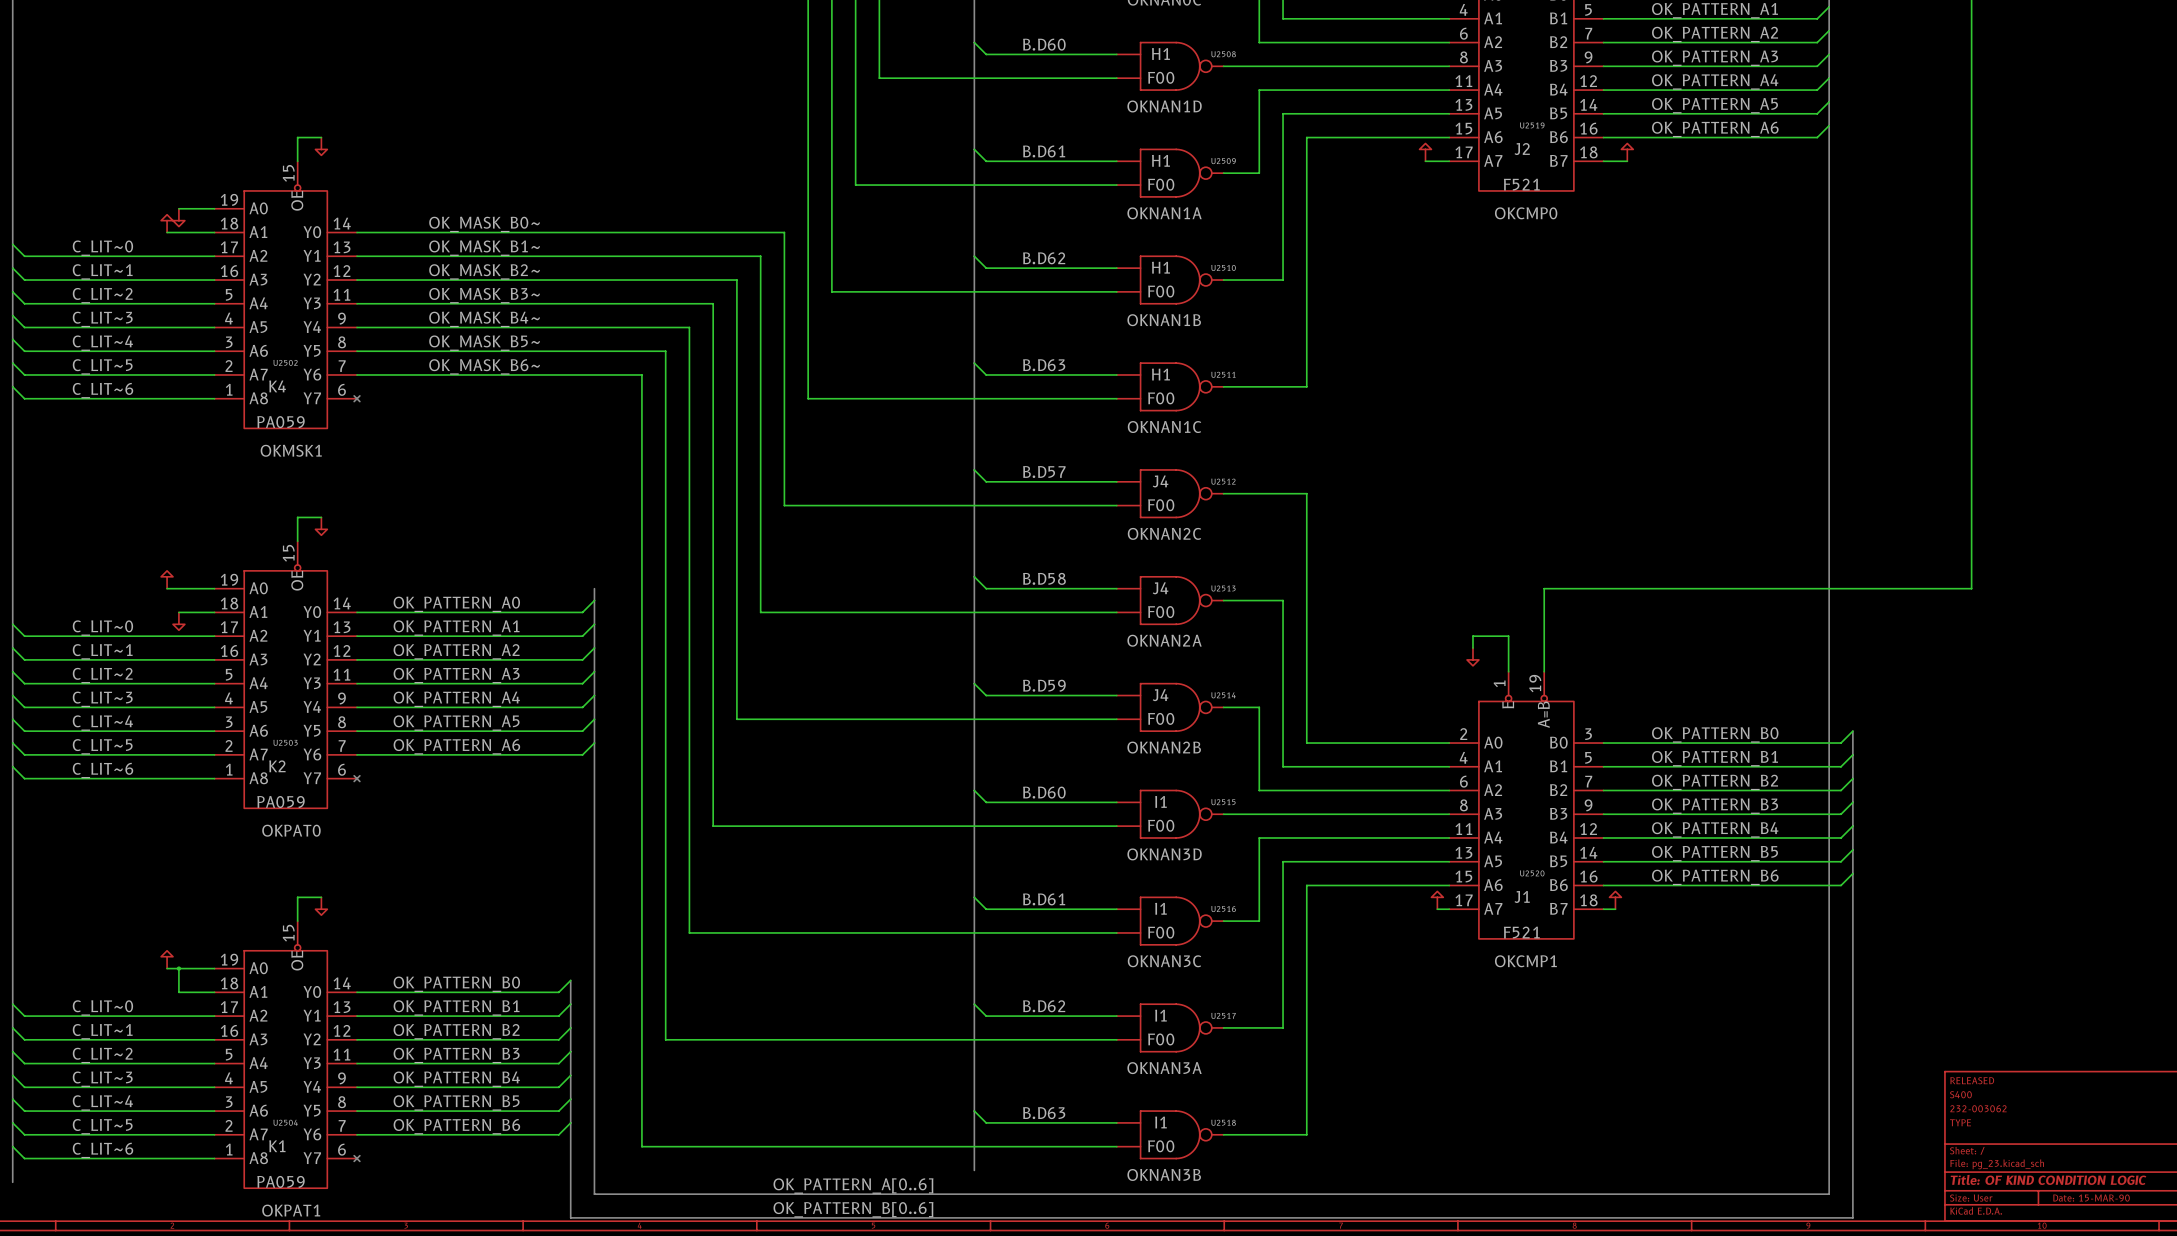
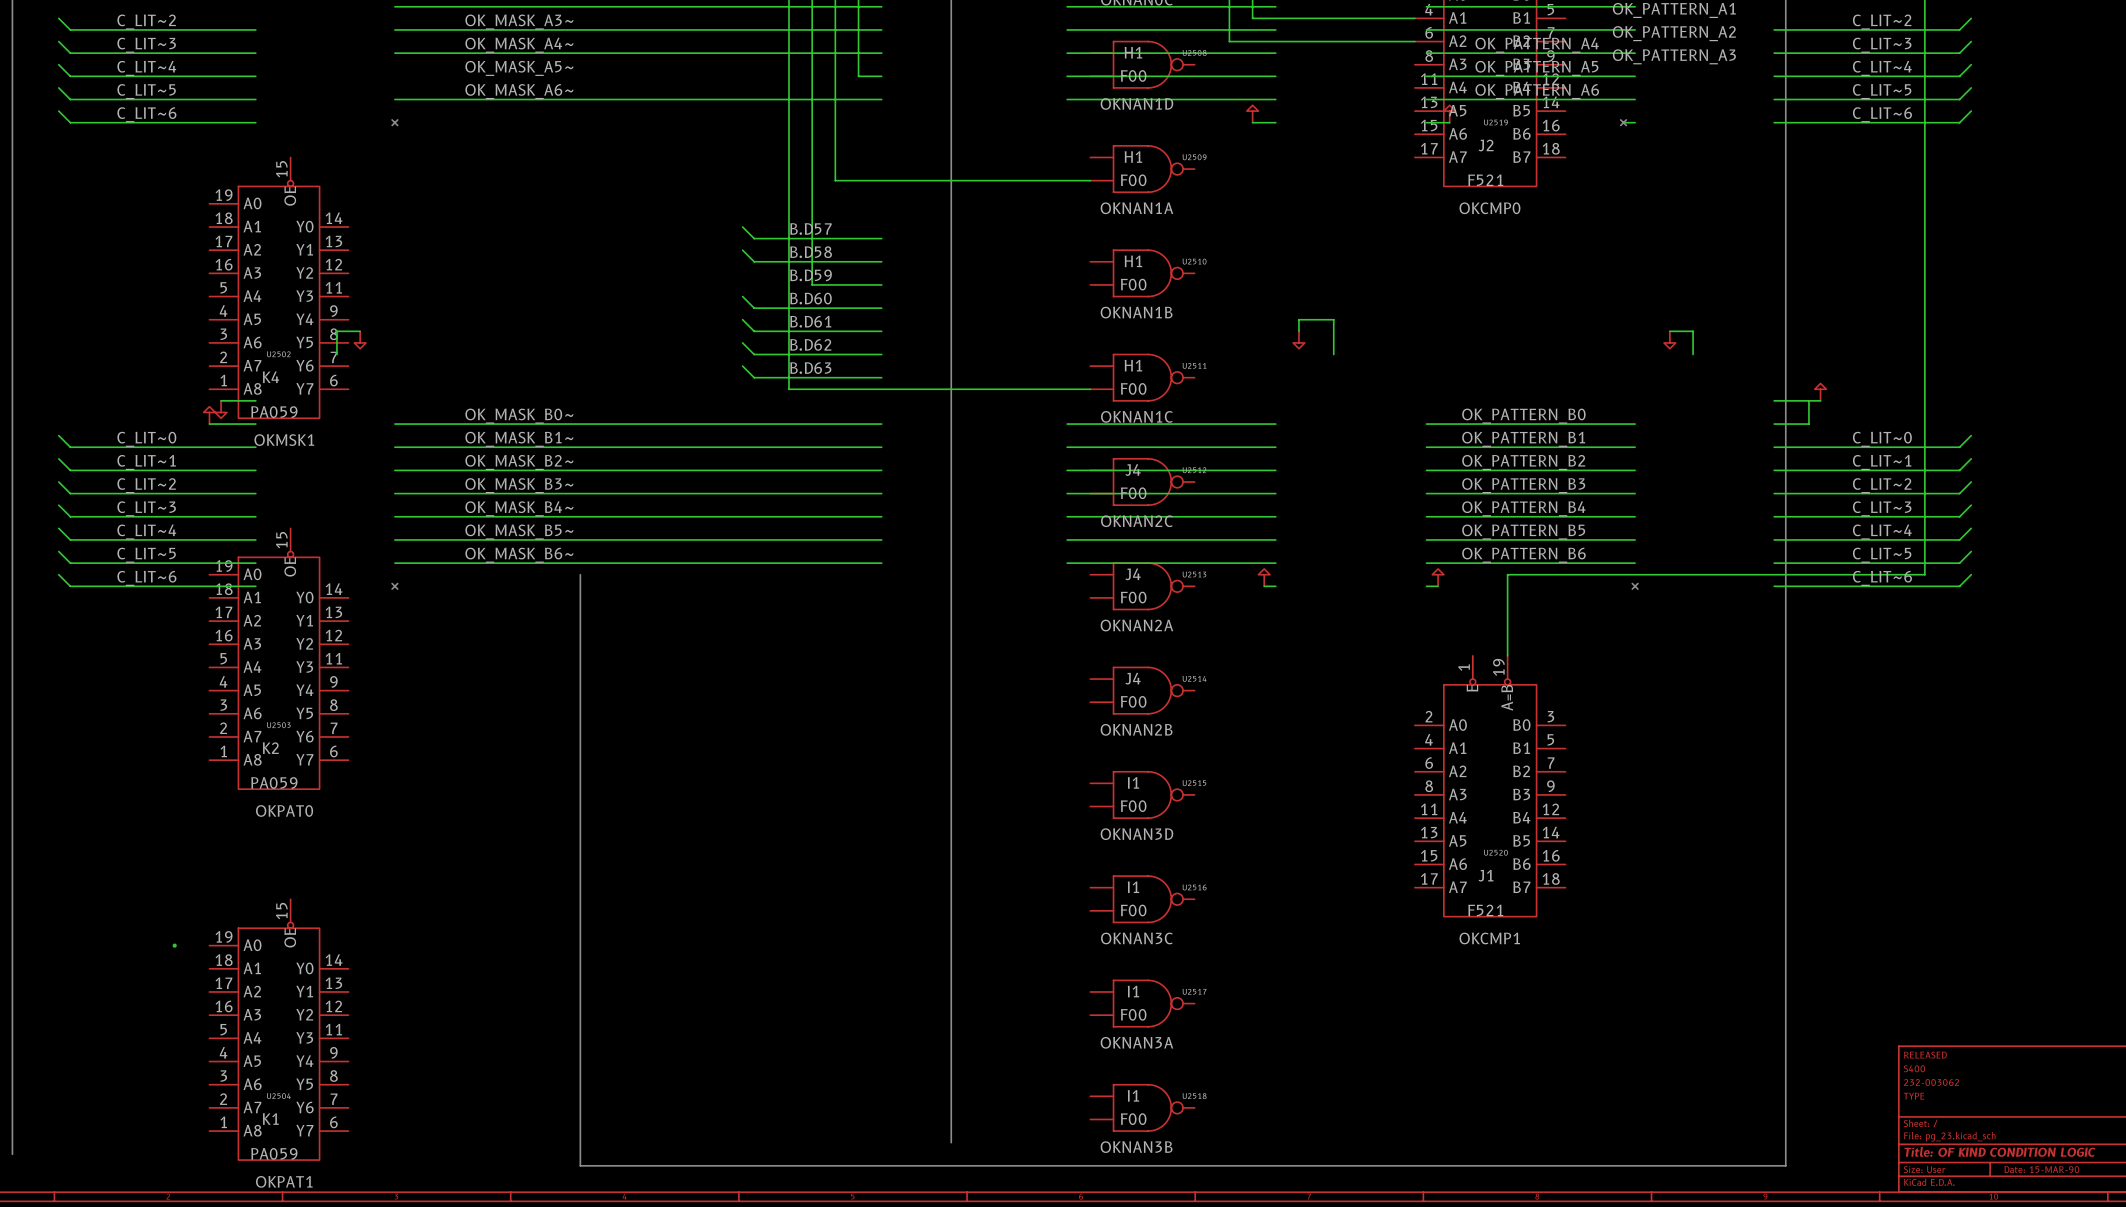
wire: none -> (394, 6) (881, 6)
wire: none -> (1067, 6) (1275, 6)
wire: none -> (1426, 6) (1635, 6)
wire: (1829, 6) (1817, 18) (1603, 18) -> none
wire: none -> (58, 18) (70, 29) (255, 29)
wire: none -> (1971, 18) (1959, 29) (1774, 29)
label: none -> C_LIT~2 (146, 22)
label: none -> OK_MASK_A3~ (519, 22)
label: none -> C_LIT~2 (1882, 22)
wire: none -> (394, 29) (881, 29)
wire: none -> (1067, 29) (1275, 29)
wire: none -> (1426, 29) (1635, 29)
wire: (1829, 30) (1817, 42) (1603, 42) -> none
wire: none -> (58, 41) (70, 53) (255, 53)
wire: (974, 42) (986, 54) (1093, 54) -> none
wire: none -> (1971, 41) (1959, 53) (1774, 53)
label: B.D60 (1044, 44) -> none
label: none -> C_LIT~3 (146, 45)
label: none -> OK_MASK_A4~ (519, 45)
label: none -> C_LIT~3 (1882, 45)
wire: none -> (394, 53) (881, 53)
wire: none -> (1090, 53) (1275, 53)
wire: none -> (1426, 53) (1635, 53)
wire: (1829, 54) (1817, 66) (1603, 66) -> none
wire: none -> (58, 64) (70, 76) (255, 76)
wire: (1223, 66) (1449, 66) -> none
wire: none -> (1971, 64) (1959, 76) (1774, 76)
label: none -> C_LIT~4 (146, 68)
label: none -> OK_MASK_A5~ (519, 68)
label: none -> C_LIT~4 (1882, 68)
wire: (903, 78) (1093, 78) -> none
wire: none -> (1090, 76) (1275, 76)
wire: none -> (1426, 76) (1635, 76)
wire: (1829, 78) (1817, 90) (1603, 90) -> none
label position: OK_PATTERN_A4 (1715, 81) -> OK_PATTERN_A4 (1537, 45)
wire: none -> (58, 87) (70, 99) (255, 99)
wire: (1449, 90) (1259, 90) (1259, 173) (1223, 173) -> none
wire: none -> (1971, 87) (1959, 99) (1774, 99)
label: none -> C_LIT~5 (146, 91)
label: none -> OK_MASK_A6~ (519, 91)
label: none -> C_LIT~5 (1882, 91)
wire: none -> (394, 99) (881, 99)
wire: none -> (1067, 99) (1275, 99)
wire: none -> (1426, 99) (1635, 99)
wire: (1829, 101) (1817, 113) (1603, 113) -> none
label position: OK_PATTERN_A5 (1715, 105) -> OK_PATTERN_A5 (1536, 68)
wire: none -> (58, 111) (70, 122) (255, 122)
wire: (1449, 113) (1283, 113) (1283, 280) (1223, 280) -> none
wire: none -> (1971, 111) (1959, 122) (1774, 122)
power symbol: none -> (1252, 113)
label: none -> C_LIT~6 (146, 114)
label: none -> C_LIT~6 (1882, 114)
no-connect mark: none -> (394, 122)
wire: none -> (1252, 122) (1275, 122)
wire: none -> (1623, 122) (1635, 122)
no-connect mark: none -> (1623, 122)
wire: (1829, 125) (1817, 137) (1603, 137) -> none
label position: OK_PATTERN_A6 (1715, 129) -> OK_PATTERN_A6 (1537, 91)
wire: (321, 137) (297, 137) (297, 161) -> none
wire: (1449, 137) (1306, 137) (1306, 386) (1223, 386) -> none
power symbol: (321, 146) -> none
wire: (974, 149) (986, 161) (1116, 161) -> none
label: B.D61 (1044, 151) -> none
power symbol position: (1425, 152) -> (1449, 113)
power symbol: (1627, 152) -> none
wire: (1425, 161) (1449, 161) -> (1426, 122) (1449, 122)
wire: (1603, 161) (1627, 161) -> none
wire: (178, 208) (214, 208) -> none
power symbol: (178, 217) -> none
power symbol: (167, 223) -> none
label: OK_MASK_B0~ (484, 224) -> none
wire: (167, 232) (214, 232) -> none
wire: (357, 232) (784, 232) (784, 505) -> (394, 493) (765, 493)
wire: none -> (742, 227) (754, 238) (881, 238)
label: none -> B.D57 (810, 229)
wire: (12, 244) (24, 256) (214, 256) -> none
label: C_LIT~0 (102, 248) -> none
label: OK_MASK_B1~ (484, 248) -> none
wire: (357, 256) (760, 256) (760, 612) (1116, 612) -> none
wire: none -> (742, 250) (754, 261) (881, 261)
wire: (974, 256) (986, 268) (1116, 268) -> none
label: none -> B.D58 (811, 252)
label: B.D62 (1044, 258) -> none
wire: (12, 268) (24, 280) (214, 280) -> none
label: C_LIT~1 (102, 271) -> none
label: OK_MASK_B2~ (484, 271) -> none
wire: (357, 280) (736, 280) (736, 719) (1116, 719) -> none
label: none -> B.D59 (811, 275)
wire: (12, 291) (24, 303) (214, 303) -> none
wire: (903, 291) (1116, 291) -> none
label: C_LIT~2 (102, 295) -> none
label: OK_MASK_B3~ (484, 295) -> none
wire: (357, 303) (713, 303) (713, 826) (1116, 826) -> none
wire: none -> (742, 296) (754, 308) (881, 308)
label: none -> B.D60 (810, 298)
wire: (12, 315) (24, 327) (214, 327) -> none
label: C_LIT~3 (102, 319) -> none
label: OK_MASK_B4~ (484, 319) -> none
wire: (357, 327) (689, 327) (689, 932) (1116, 932) -> none
wire: none -> (742, 319) (754, 331) (881, 331)
label: none -> B.D61 (810, 321)
wire: (12, 339) (24, 351) (214, 351) -> none
wire: none -> (360, 331) (336, 331) (336, 354)
wire: none -> (1298, 331) (1298, 319) (1333, 319) (1333, 354)
wire: none -> (1669, 331) (1693, 331) (1693, 354)
label: C_LIT~4 (102, 343) -> none
label: OK_MASK_B5~ (484, 343) -> none
power symbol: none -> (360, 340)
power symbol: none -> (1298, 340)
power symbol: none -> (1669, 340)
wire: (357, 351) (665, 351) (665, 1039) (1116, 1039) -> none
wire: none -> (742, 342) (754, 354) (881, 354)
label: none -> B.D62 (810, 344)
wire: (12, 363) (24, 374) (214, 374) -> (58, 435) (70, 447) (255, 447)
wire: (974, 363) (986, 374) (1116, 374) -> none
label: B.D63 (1044, 365) -> none
label: C_LIT~5 (102, 366) -> none
label: OK_MASK_B6~ (484, 366) -> none
wire: (357, 374) (641, 374) (641, 1146) (1116, 1146) -> none
wire: none -> (742, 366) (754, 377) (881, 377)
label: none -> B.D63 (810, 368)
wire: (12, 386) (24, 398) (214, 398) -> (58, 458) (70, 470) (255, 470)
label: C_LIT~6 (102, 390) -> none
no-connect mark: (357, 398) -> none
power symbol: none -> (1820, 392)
wire: none -> (221, 400) (255, 400)
wire: none -> (1774, 400) (1820, 400)
wire: none -> (1808, 400) (1808, 424) (1774, 424)
power symbol: none -> (221, 409)
power symbol: none -> (209, 415)
label: none -> OK_MASK_B0~ (519, 416)
label: none -> OK_PATTERN_B0 (1523, 416)
wire: none -> (209, 424) (255, 424)
wire: none -> (394, 424) (881, 424)
wire: none -> (1067, 424) (1275, 424)
wire: none -> (1426, 424) (1635, 424)
wire: none -> (1971, 435) (1959, 447) (1774, 447)
label: none -> C_LIT~0 (146, 439)
label: none -> OK_MASK_B1~ (519, 439)
label: none -> OK_PATTERN_B1 (1523, 439)
label: none -> C_LIT~0 (1882, 439)
wire: none -> (394, 447) (881, 447)
wire: none -> (1067, 447) (1275, 447)
wire: none -> (1426, 447) (1635, 447)
wire: (974, 469) (986, 481) (1093, 481) -> none
wire: none -> (1971, 458) (1959, 470) (1774, 470)
label: B.D57 (1044, 472) -> none
label: none -> C_LIT~1 (146, 462)
label: none -> OK_MASK_B2~ (519, 462)
label: none -> OK_PATTERN_B2 (1523, 462)
label: none -> C_LIT~1 (1882, 462)
wire: none -> (394, 470) (881, 470)
wire: none -> (1090, 470) (1275, 470)
wire: none -> (1426, 470) (1635, 470)
wire: none -> (58, 482) (70, 493) (255, 493)
wire: (1223, 493) (1306, 493) (1306, 743) (1449, 743) -> none
wire: none -> (1971, 482) (1959, 493) (1774, 493)
label: none -> C_LIT~2 (146, 485)
label: none -> OK_MASK_B3~ (519, 485)
label: none -> OK_PATTERN_B3 (1523, 485)
label: none -> C_LIT~2 (1882, 485)
wire: (903, 505) (1093, 505) -> none
wire: none -> (1090, 493) (1275, 493)
wire: none -> (1426, 493) (1635, 493)
wire: none -> (58, 505) (70, 516) (255, 516)
wire: (321, 517) (297, 517) (297, 541) -> none
wire: none -> (1971, 505) (1959, 516) (1774, 516)
label: none -> C_LIT~3 (146, 508)
label: none -> OK_MASK_B4~ (519, 508)
label: none -> OK_PATTERN_B4 (1523, 508)
label: none -> C_LIT~3 (1882, 508)
power symbol: (321, 526) -> none
wire: none -> (394, 516) (881, 516)
wire: none -> (1067, 516) (1275, 516)
wire: none -> (1426, 516) (1635, 516)
wire: none -> (1971, 528) (1959, 539) (1774, 539)
label: none -> C_LIT~4 (146, 532)
label: none -> OK_MASK_B5~ (519, 532)
label: none -> OK_PATTERN_B5 (1523, 532)
label: none -> C_LIT~4 (1882, 532)
wire: none -> (394, 539) (881, 539)
wire: none -> (1067, 539) (1275, 539)
wire: none -> (1426, 539) (1635, 539)
wire: none -> (1971, 551) (1959, 563) (1774, 563)
label: none -> C_LIT~5 (146, 555)
label: none -> OK_MASK_B6~ (519, 555)
label: none -> OK_PATTERN_B6 (1523, 555)
label: none -> C_LIT~5 (1882, 555)
wire: none -> (394, 563) (881, 563)
wire: (974, 576) (986, 588) (1116, 588) -> none
wire: none -> (1067, 563) (1275, 563)
wire: none -> (1426, 563) (1635, 563)
label: B.D58 (1044, 578) -> none
power symbol: (167, 579) -> none
wire: (167, 588) (214, 588) -> none
wire: none -> (1971, 574) (1959, 586) (1774, 586)
power symbol: none -> (1264, 577)
label: none -> C_LIT~6 (146, 578)
label: none -> C_LIT~6 (1882, 578)
no-connect mark: none -> (394, 586)
wire: (594, 600) (582, 612) (357, 612) -> none
wire: (1223, 600) (1283, 600) (1283, 766) (1449, 766) -> none
wire: none -> (1264, 586) (1275, 586)
wire: none -> (1426, 586) (1438, 586)
no-connect mark: none -> (1635, 586)
label: OK_PATTERN_A0 (456, 604) -> none
wire: (178, 612) (214, 612) -> none
power symbol: (178, 621) -> none
wire: (12, 624) (24, 636) (214, 636) -> (58, 528) (70, 539) (255, 539)
wire: (594, 624) (582, 636) (357, 636) -> none
label: C_LIT~0 (102, 628) -> none
label: OK_PATTERN_A1 (456, 628) -> none
wire: (12, 648) (24, 659) (214, 659) -> (58, 551) (70, 563) (255, 563)
wire: (594, 648) (582, 659) (357, 659) -> none
wire: (1472, 648) (1472, 636) (1508, 636) (1508, 671) -> none
label: C_LIT~1 (102, 651) -> none
label: OK_PATTERN_A2 (456, 651) -> none
power symbol position: (1472, 657) -> (1438, 577)
power symbol rotation: 0° (1472, 662) -> 180° (1438, 571)
wire: (12, 671) (24, 683) (214, 683) -> (58, 574) (70, 586) (255, 586)
wire: (594, 671) (582, 683) (357, 683) -> none
label: C_LIT~2 (102, 675) -> none
label: OK_PATTERN_A3 (456, 675) -> none
wire: (974, 683) (986, 695) (1116, 695) -> none
label: B.D59 (1044, 685) -> none
wire: (12, 695) (24, 707) (214, 707) -> none
wire: (594, 695) (582, 707) (357, 707) -> none
label: C_LIT~3 (102, 699) -> none
label: OK_PATTERN_A4 (456, 699) -> none
wire: (1223, 707) (1259, 707) (1259, 790) (1449, 790) -> none
wire: (12, 719) (24, 731) (214, 731) -> none
wire: (594, 719) (582, 731) (357, 731) -> none
label: C_LIT~4 (102, 723) -> none
label: OK_PATTERN_A5 (456, 723) -> none
bus: (1852, 731) (1852, 1217) (570, 1217) (570, 980) -> none
wire: (1852, 731) (1841, 743) (1603, 743) -> none
label: OK_PATTERN_B0 (1715, 734) -> none
wire: (12, 743) (24, 754) (214, 754) -> none
wire: (594, 743) (582, 754) (357, 754) -> none
label: C_LIT~5 (102, 746) -> none
label: OK_PATTERN_A6 (456, 746) -> none
wire: (1852, 754) (1841, 766) (1603, 766) -> none
label: OK_PATTERN_B1 (1715, 758) -> none
wire: (12, 766) (24, 778) (214, 778) -> none
label: C_LIT~6 (102, 770) -> none
no-connect mark: (357, 778) -> none
wire: (1852, 778) (1841, 790) (1603, 790) -> none
label: OK_PATTERN_B2 (1715, 782) -> none
wire: (974, 790) (986, 802) (1116, 802) -> none
label: B.D60 (1044, 792) -> none
wire: (1852, 802) (1841, 814) (1603, 814) -> none
label: OK_PATTERN_B3 (1715, 806) -> none
wire: (1223, 814) (1449, 814) -> none
wire: (1852, 826) (1841, 837) (1603, 837) -> none
label: OK_PATTERN_B4 (1715, 829) -> none
wire: (1449, 837) (1259, 837) (1259, 921) (1223, 921) -> none
wire: (1852, 849) (1841, 861) (1603, 861) -> none
label: OK_PATTERN_B5 (1715, 853) -> none
wire: (1449, 861) (1283, 861) (1283, 1027) (1223, 1027) -> none
wire: (1852, 873) (1841, 885) (1603, 885) -> none
label: OK_PATTERN_B6 (1715, 877) -> none
wire: (1449, 885) (1306, 885) (1306, 1134) (1223, 1134) -> none
wire: (321, 897) (297, 897) (297, 921) -> none
wire: (974, 897) (986, 909) (1116, 909) -> none
label: B.D61 (1044, 899) -> none
power symbol: (1437, 900) -> none
power symbol: (1615, 900) -> none
power symbol: (321, 906) -> none
wire: (1437, 909) (1449, 909) -> none
wire: (1603, 909) (1615, 909) -> none
power symbol: (167, 959) -> none
wire: (167, 968) (214, 968) -> none
wire: (178, 968) (178, 992) (214, 992) -> none
wire: (570, 980) (558, 992) (357, 992) -> none
label: OK_PATTERN_B0 (456, 984) -> none
wire: (12, 1004) (24, 1016) (214, 1016) -> none
wire: (570, 1004) (558, 1016) (357, 1016) -> none
wire: (974, 1004) (986, 1016) (1116, 1016) -> none
label: B.D62 (1044, 1006) -> none
label: C_LIT~0 (102, 1007) -> none
label: OK_PATTERN_B1 (456, 1007) -> none
wire: (12, 1027) (24, 1039) (214, 1039) -> none
wire: (570, 1027) (558, 1039) (357, 1039) -> none
label: C_LIT~1 (102, 1031) -> none
label: OK_PATTERN_B2 (456, 1031) -> none
wire: (12, 1051) (24, 1063) (214, 1063) -> none
wire: (570, 1051) (558, 1063) (357, 1063) -> none
label: C_LIT~2 (102, 1055) -> none
label: OK_PATTERN_B3 (456, 1055) -> none
wire: (12, 1075) (24, 1087) (214, 1087) -> none
wire: (570, 1075) (558, 1087) (357, 1087) -> none
label: C_LIT~3 (102, 1079) -> none
label: OK_PATTERN_B4 (456, 1079) -> none
wire: (12, 1099) (24, 1111) (214, 1111) -> none
wire: (570, 1099) (558, 1111) (357, 1111) -> none
label: C_LIT~4 (102, 1102) -> none
label: OK_PATTERN_B5 (456, 1102) -> none
wire: (974, 1111) (986, 1122) (1116, 1122) -> none
label: B.D63 (1044, 1113) -> none
wire: (12, 1122) (24, 1134) (214, 1134) -> none
wire: (570, 1122) (558, 1134) (357, 1134) -> none
label: C_LIT~5 (102, 1126) -> none
label: OK_PATTERN_B6 (456, 1126) -> none
wire: (12, 1146) (24, 1158) (214, 1158) -> none
label: C_LIT~6 (102, 1150) -> none
no-connect mark: (357, 1158) -> none
label: OK_PATTERN_A[0..6] (853, 1186) -> none
label: OK_PATTERN_B[0..6] (853, 1209) -> none

